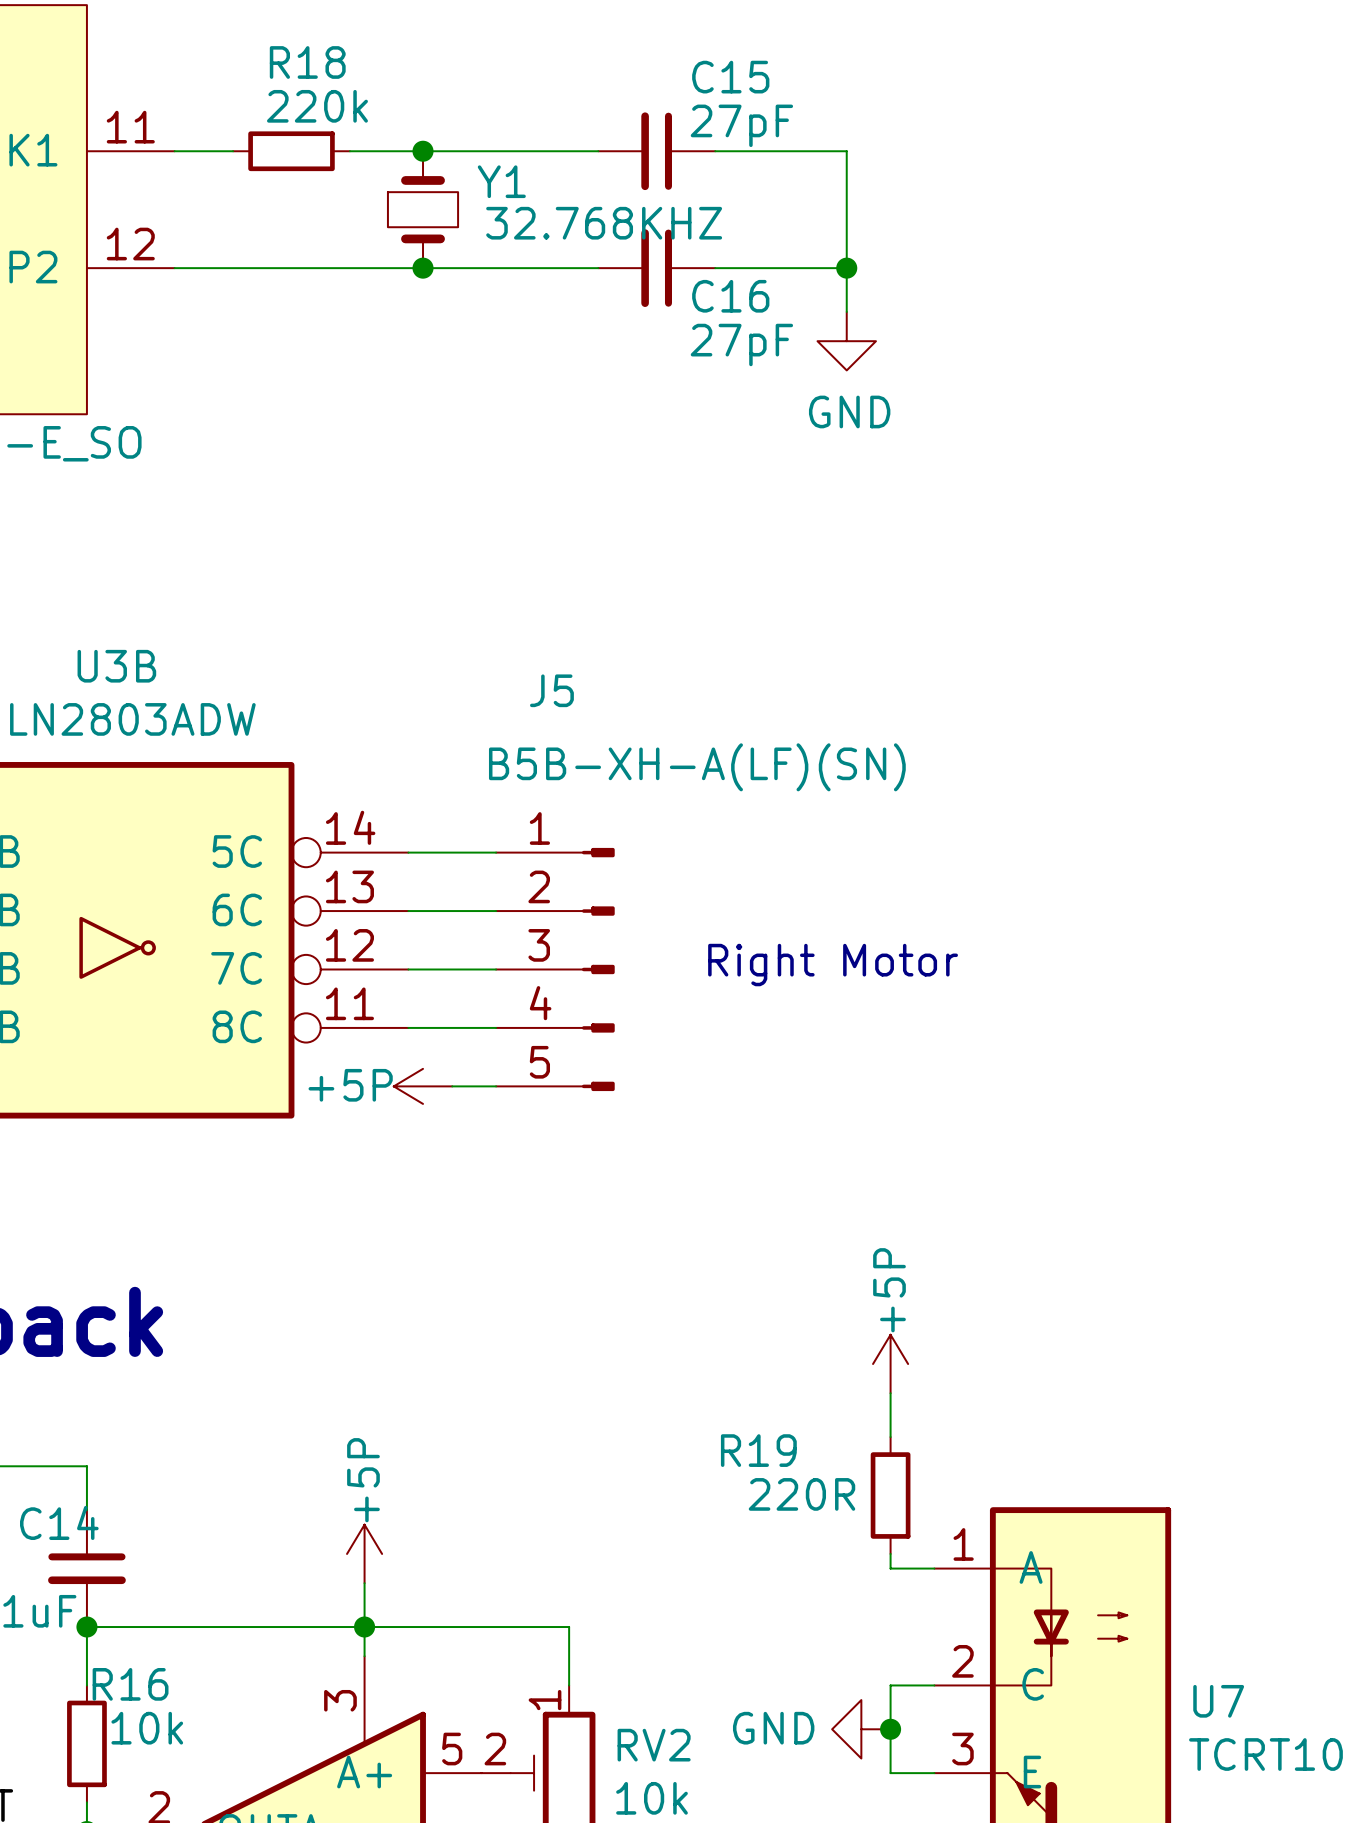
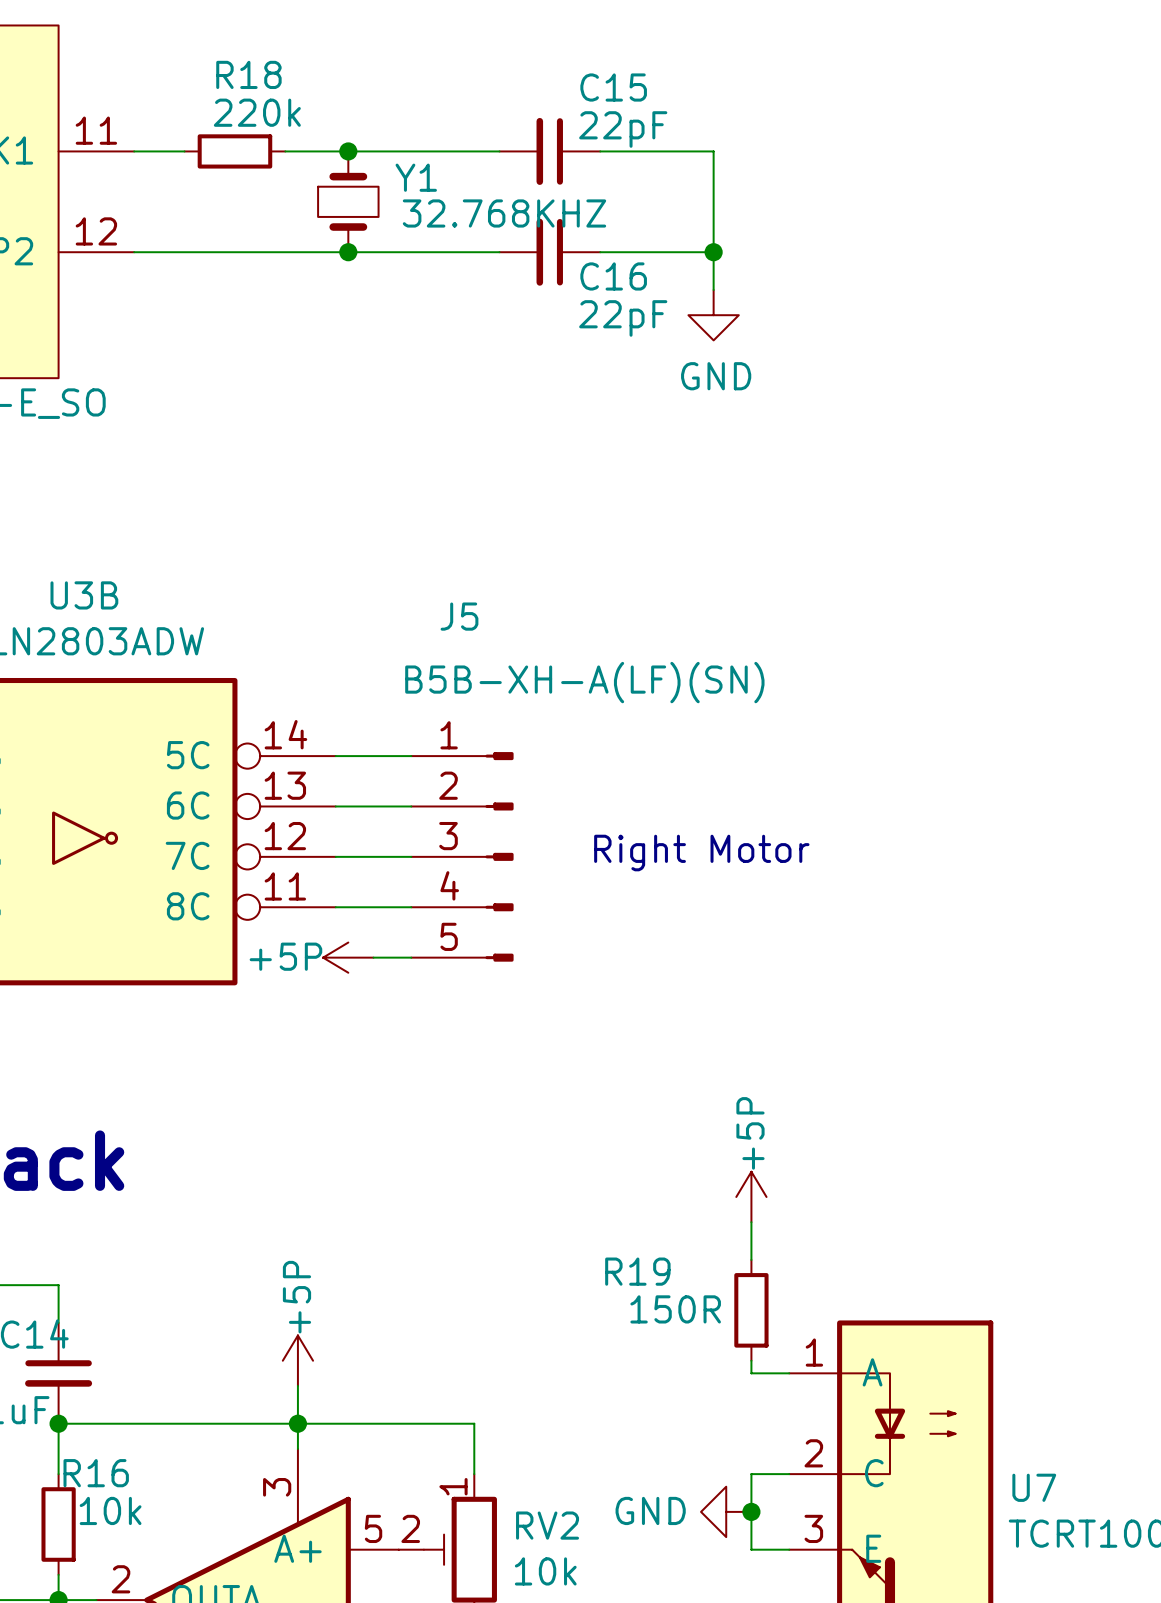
C15 value: 27pF (741, 125) -> 22pF (623, 129)
C16 value: 27pF (741, 344) -> 22pF (623, 318)
R19 value: 220R (801, 1494) -> 150R (675, 1309)

